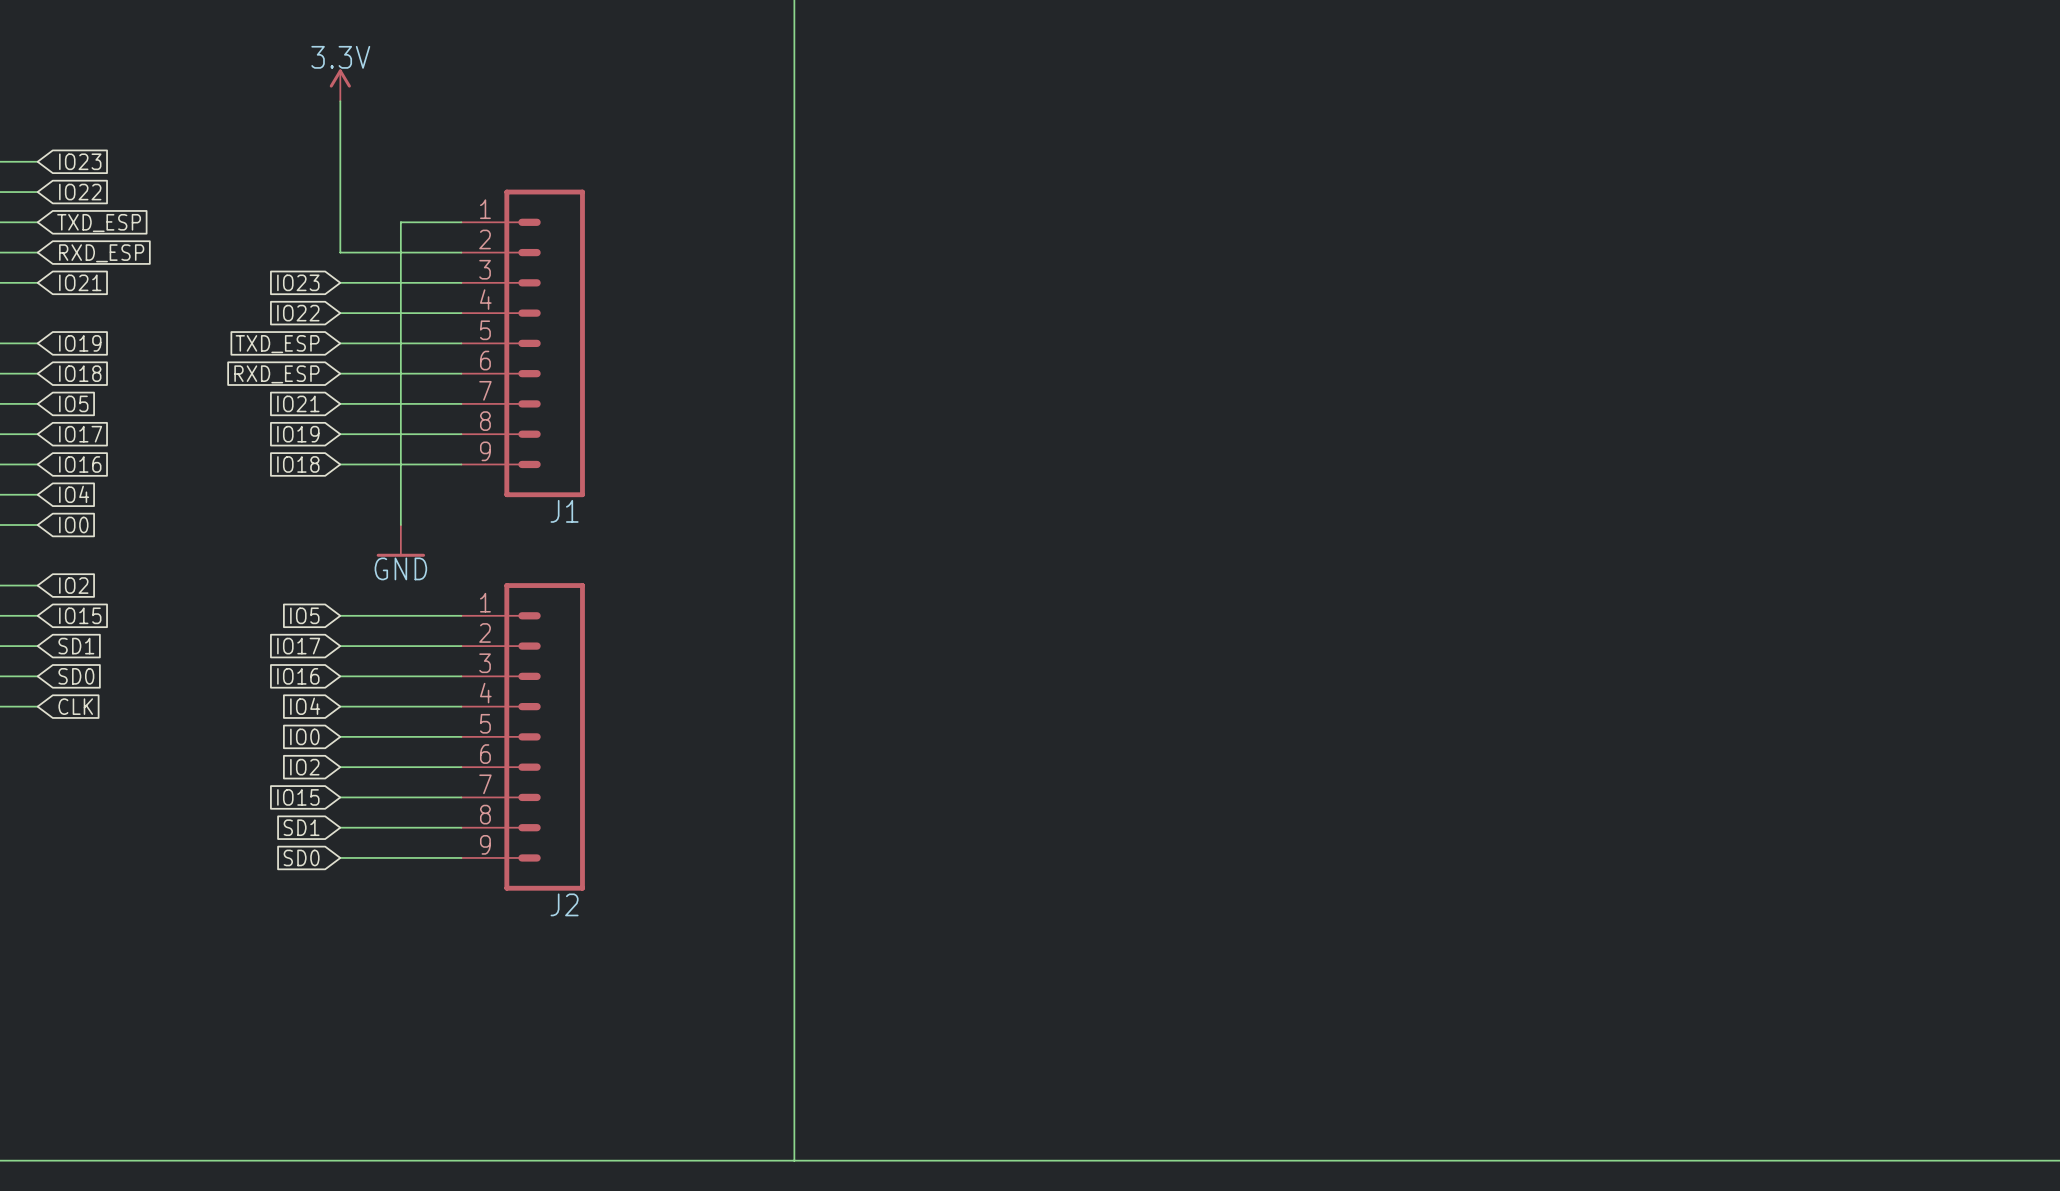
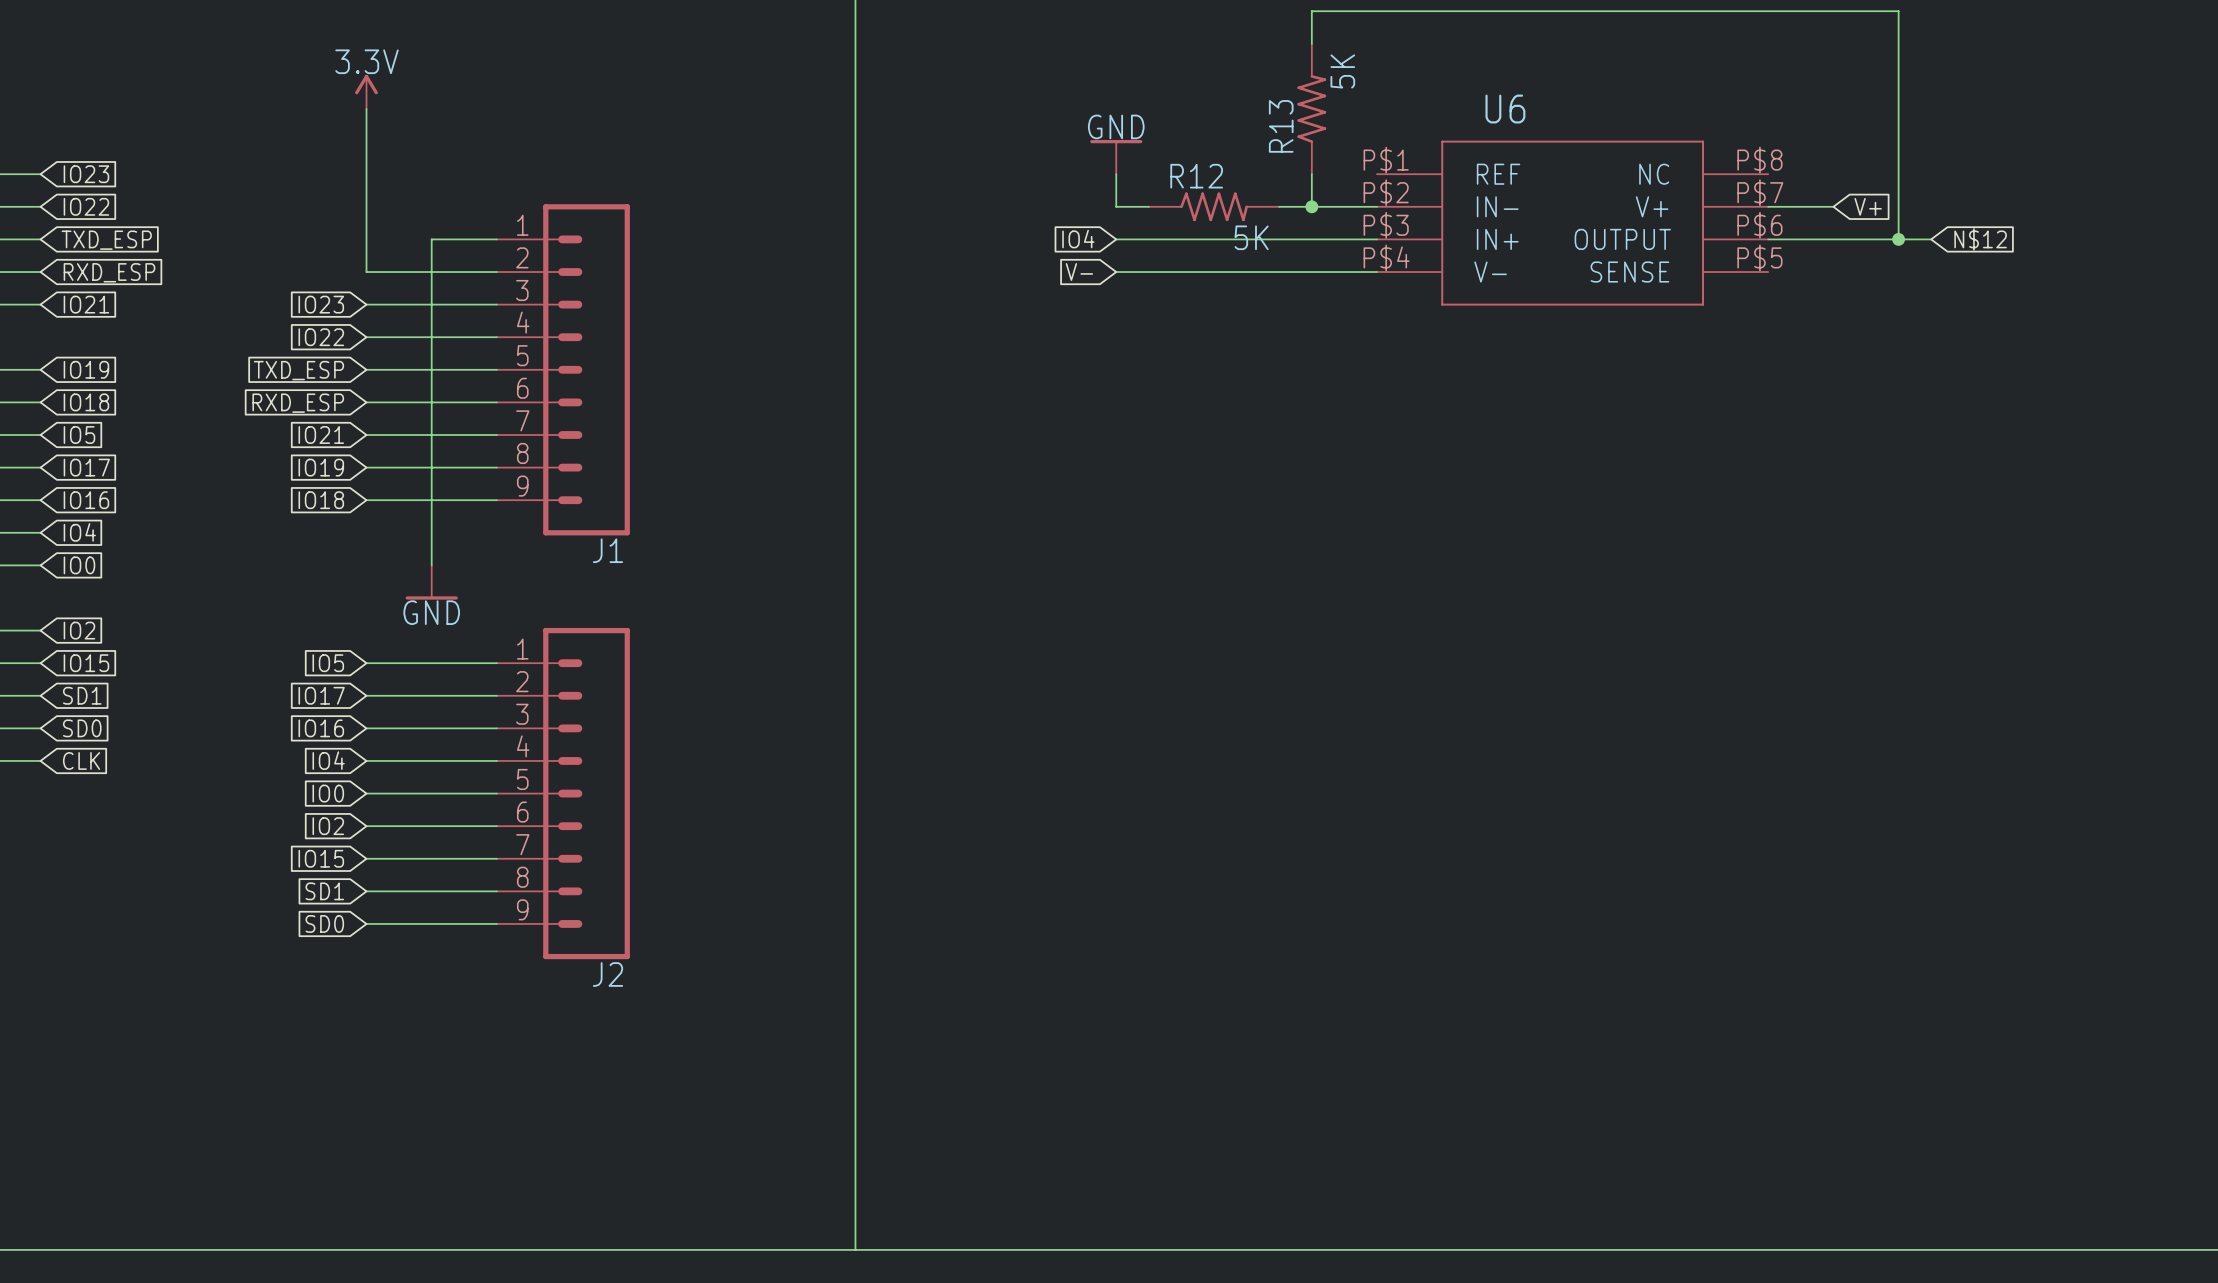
wire: none -> (1311, 43) (1311, 11) (1898, 11) (1898, 239)
R13: none -> 5K (1311, 109)
power symbol: none -> GND (1116, 157)
wire: none -> (1116, 174) (1116, 206) (1148, 206)
wire: none -> (1311, 174) (1311, 206)
R12: none -> 5K (1214, 206)
wire: none -> (1279, 206) (1377, 206)
junction: none -> (1311, 206)
wire: none -> (1768, 206) (1833, 206)
global label: none -> V+ (1868, 206)
U6: none -> (1572, 223)
global label: none -> IO4 (1078, 239)
wire: none -> (1116, 239) (1377, 239)
wire: none -> (1768, 239) (1931, 239)
junction: none -> (1898, 239)
global label: none -> N$12 (1980, 239)
global label: none -> V- (1079, 272)
wire: none -> (1116, 272) (1377, 272)

